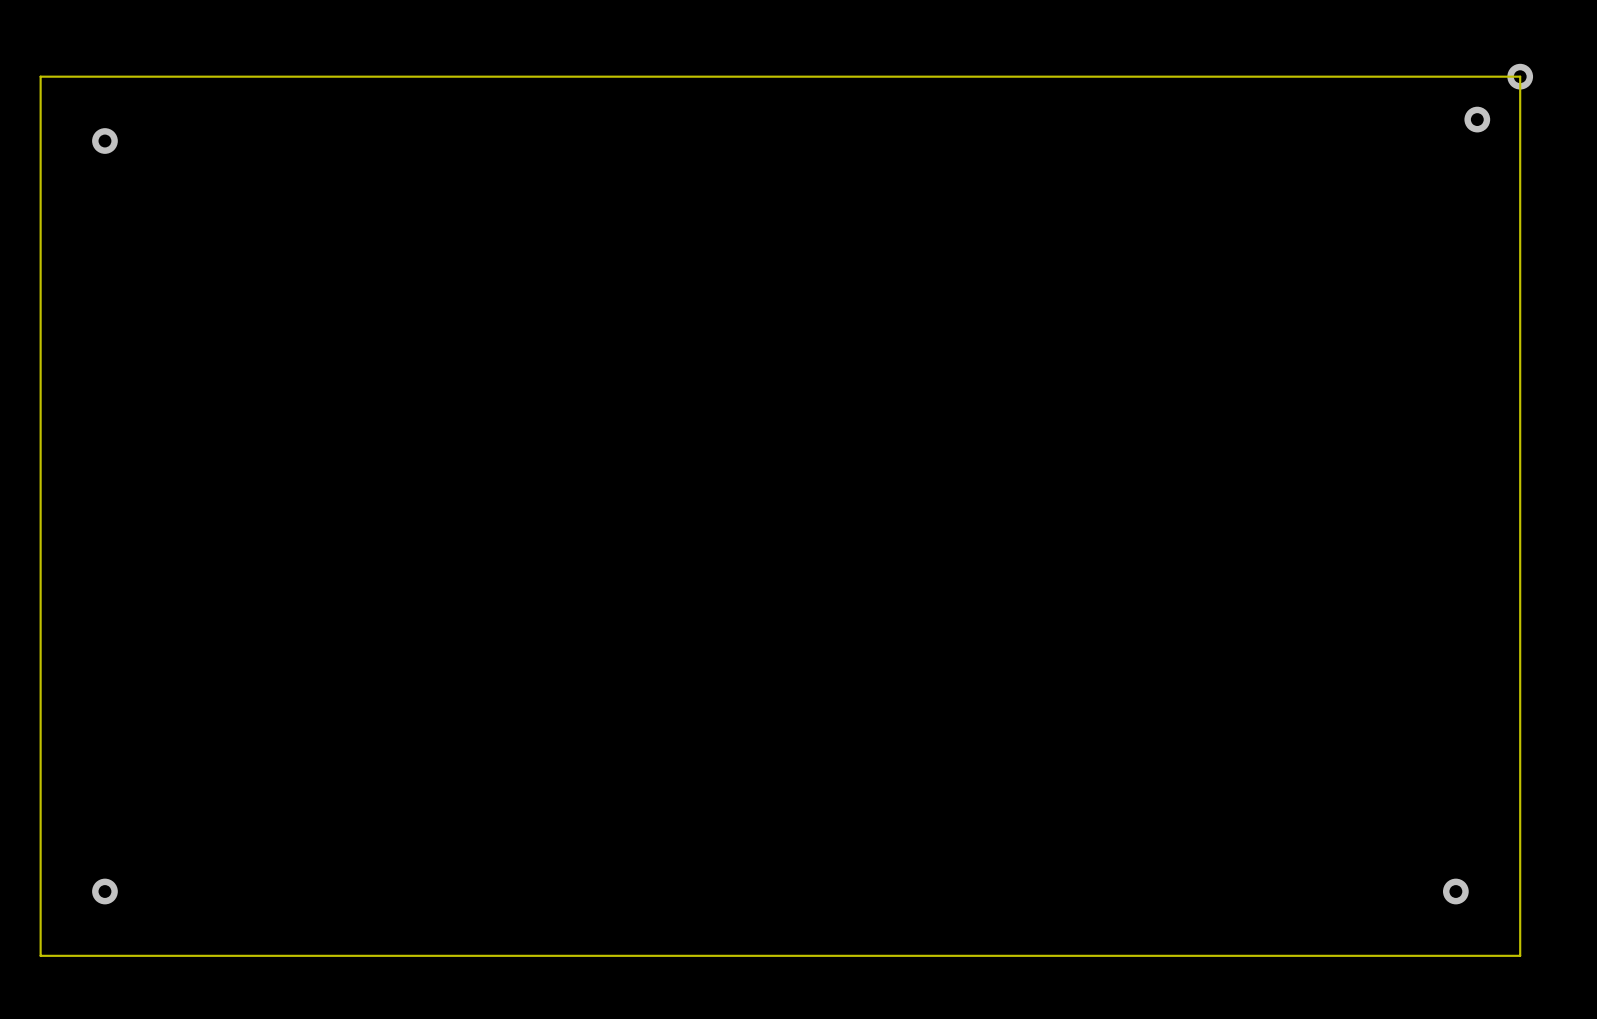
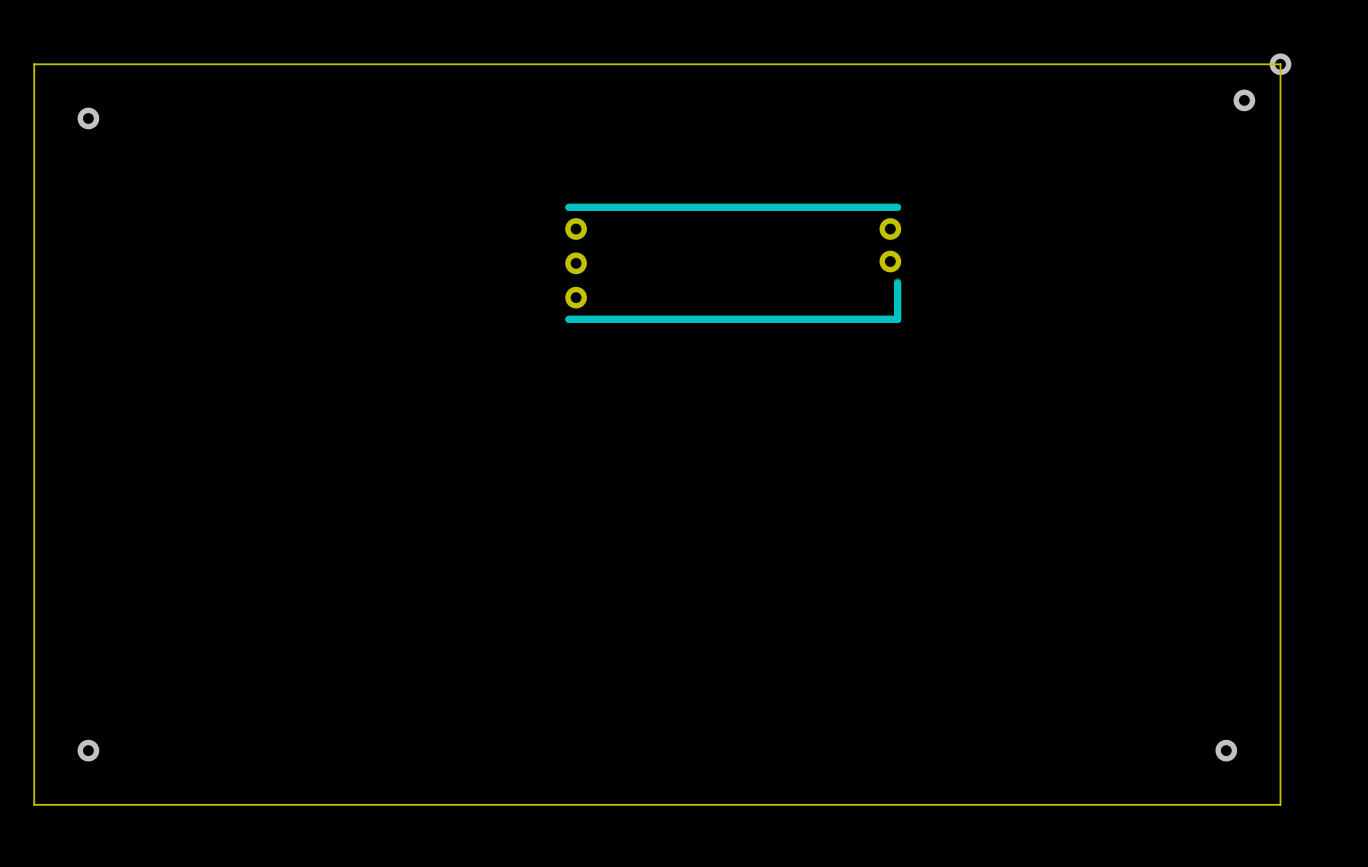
part: none -> (733, 263)

